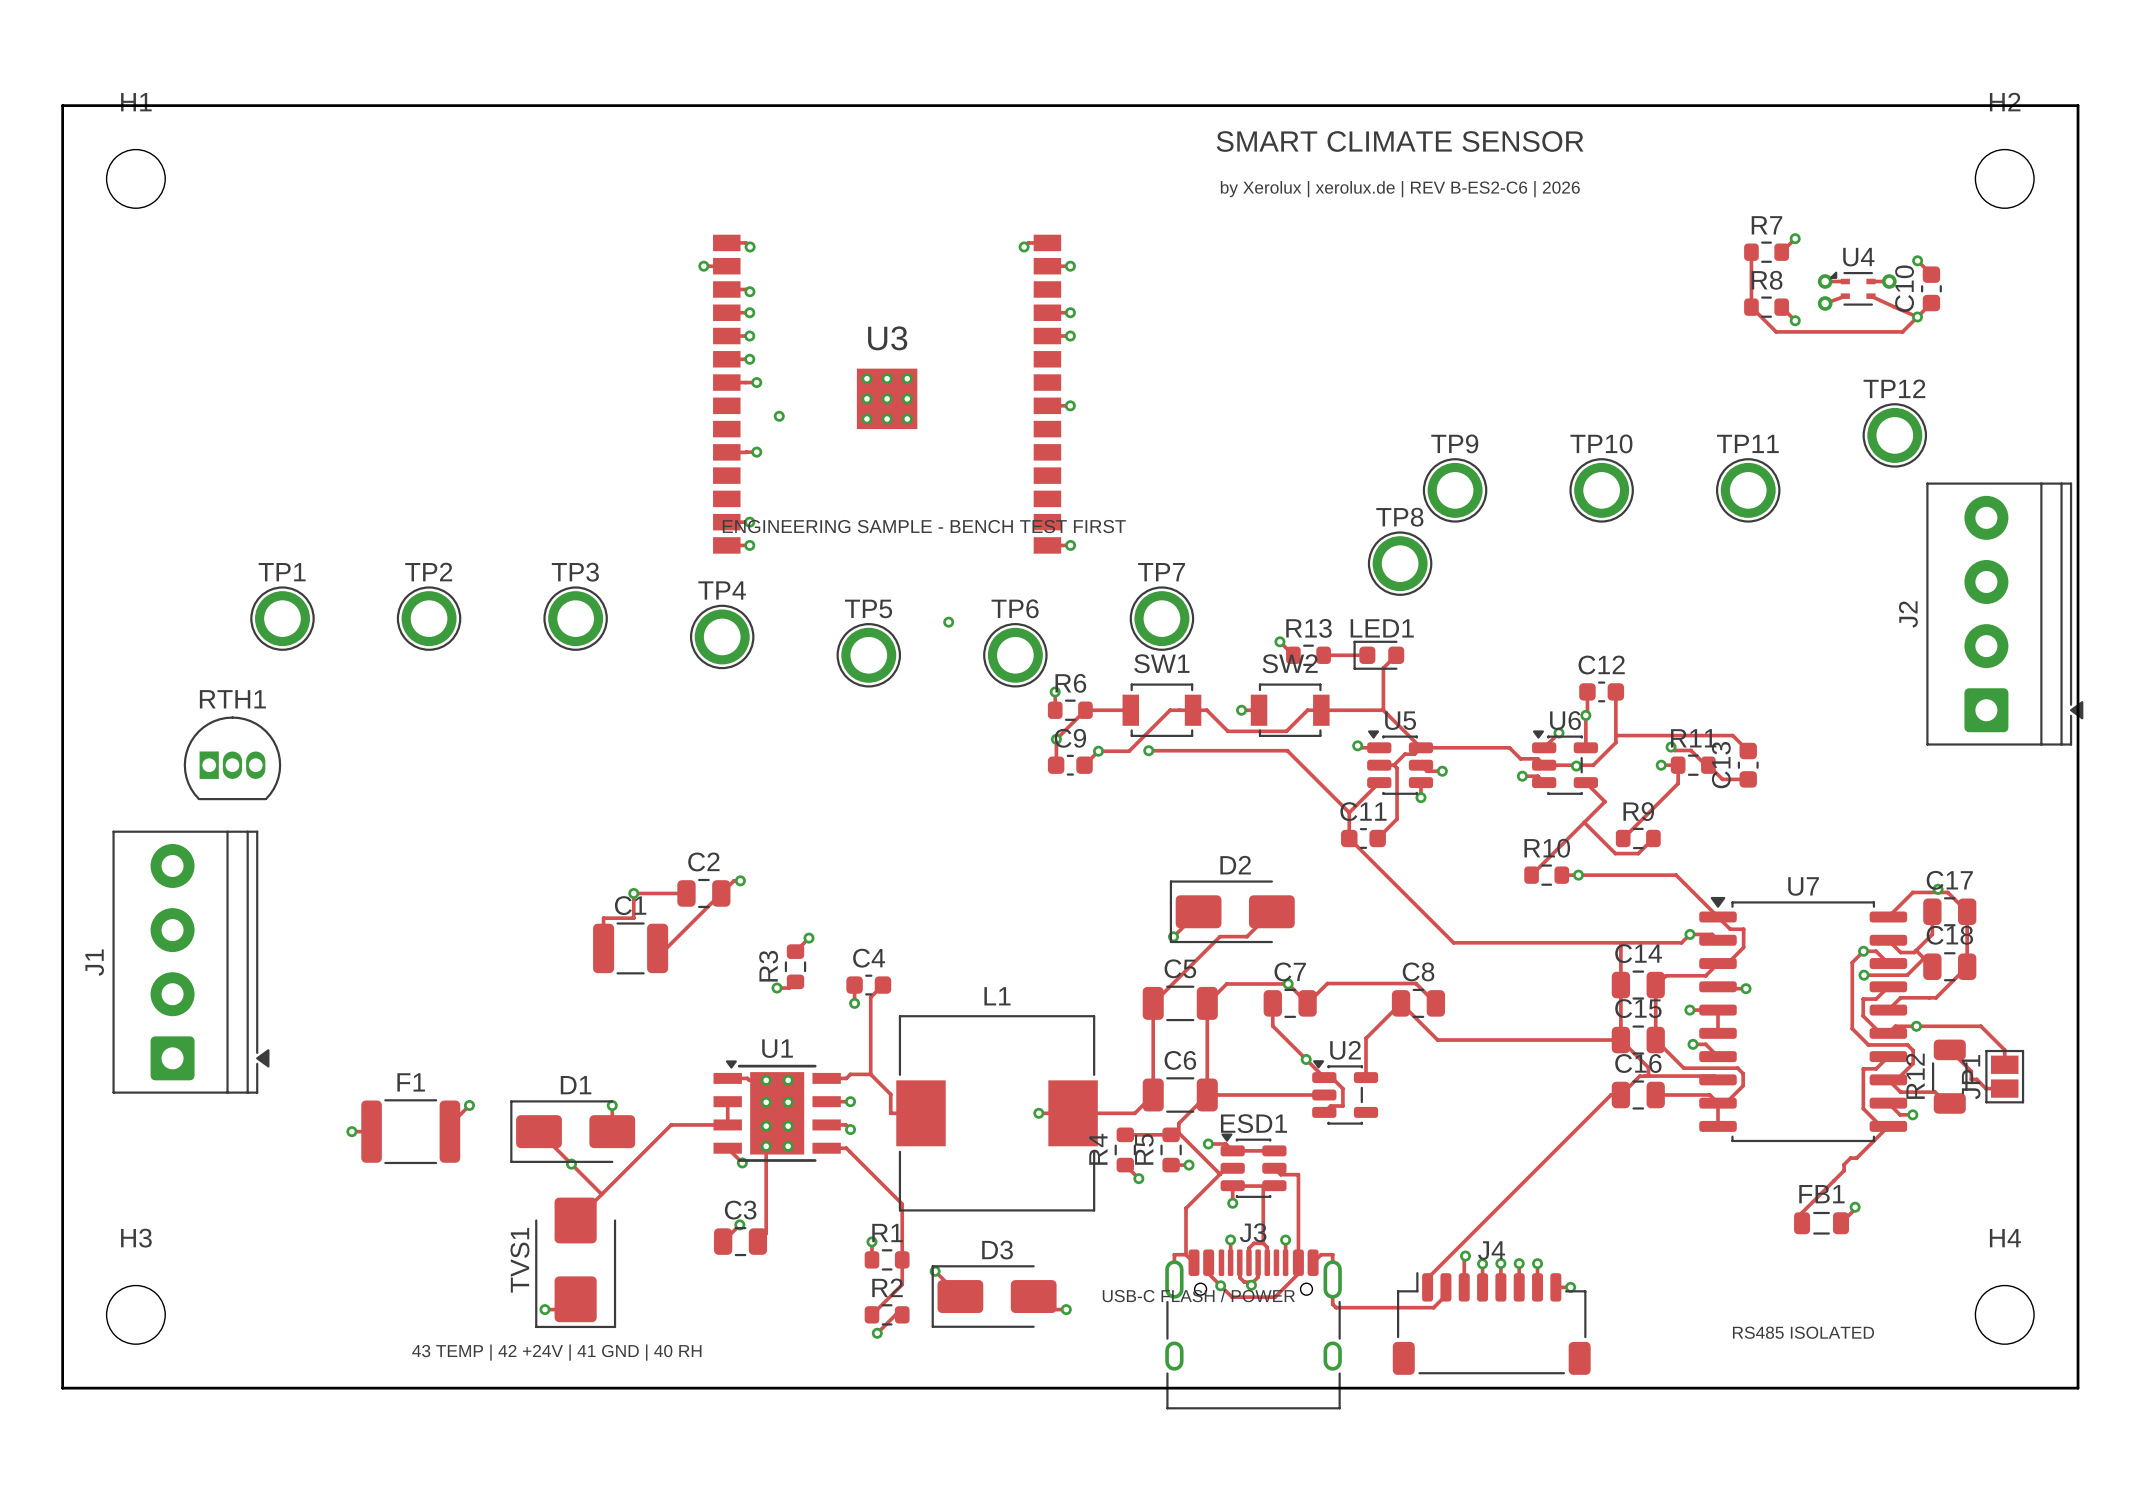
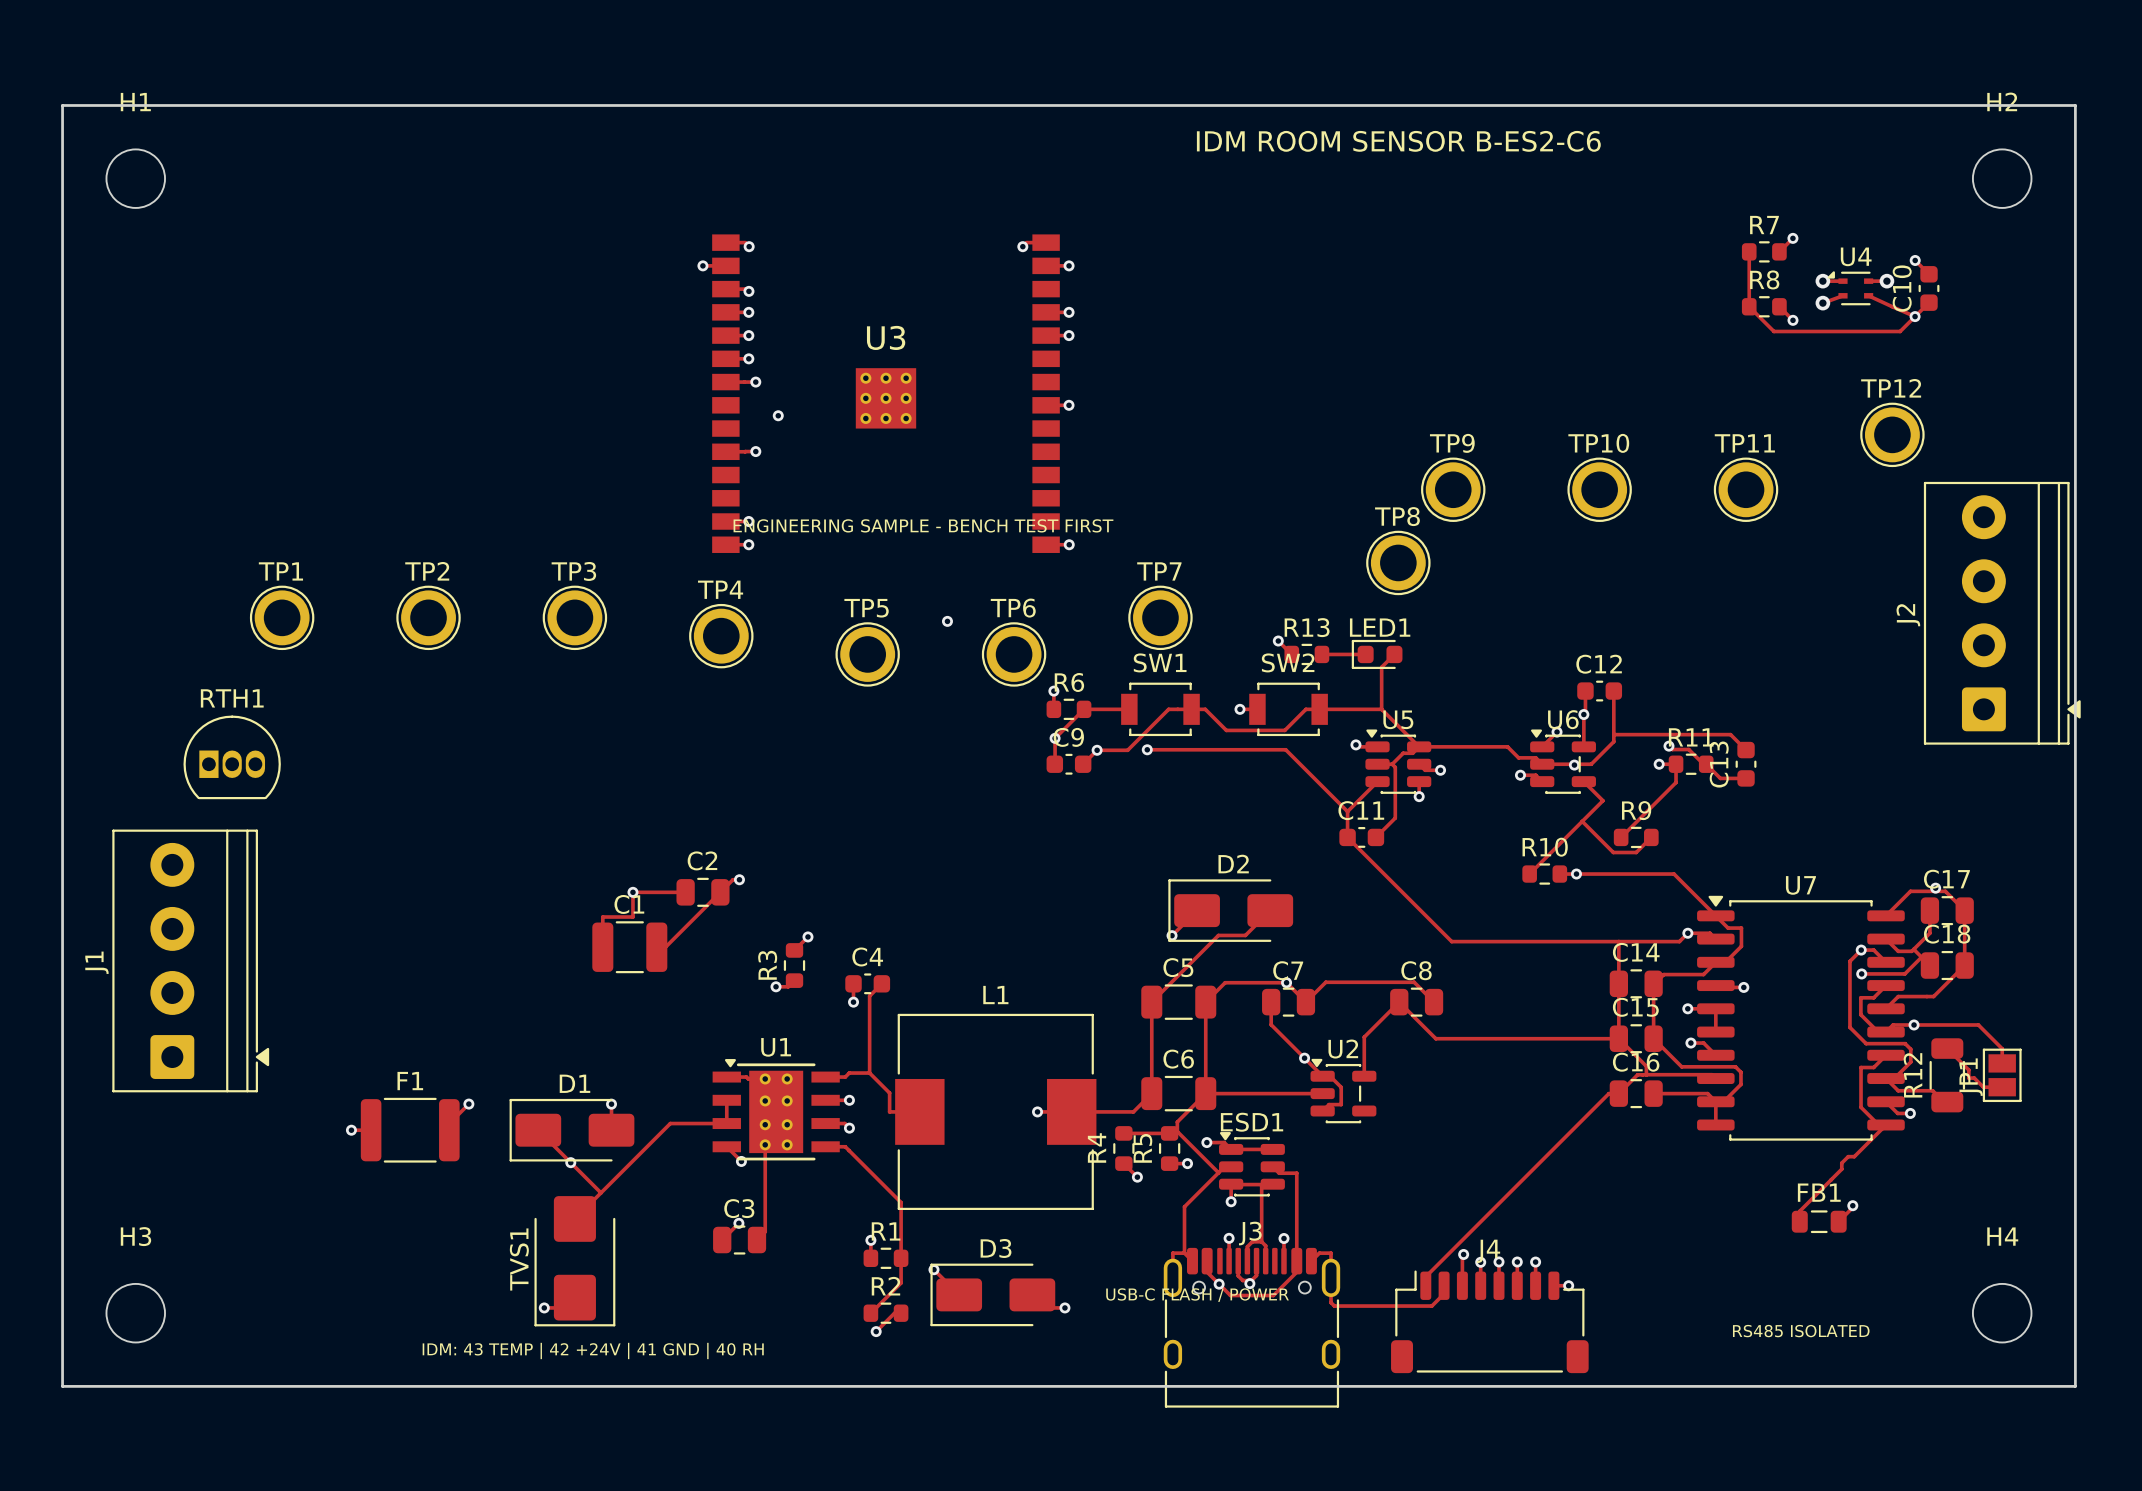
text: SMART CLIMATE SENSOR (1400, 141) -> IDM ROOM SENSOR B-ES2-C6 (1398, 141)
text: by Xerolux | xerolux.de | REV B-ES2-C6 | 2026 (1400, 189) -> none
text: 43 TEMP | 42 +24V | 41 GND | 40 RH (556, 1352) -> IDM: 43 TEMP | 42 +24V | 41 GND | 40 RH (593, 1350)

